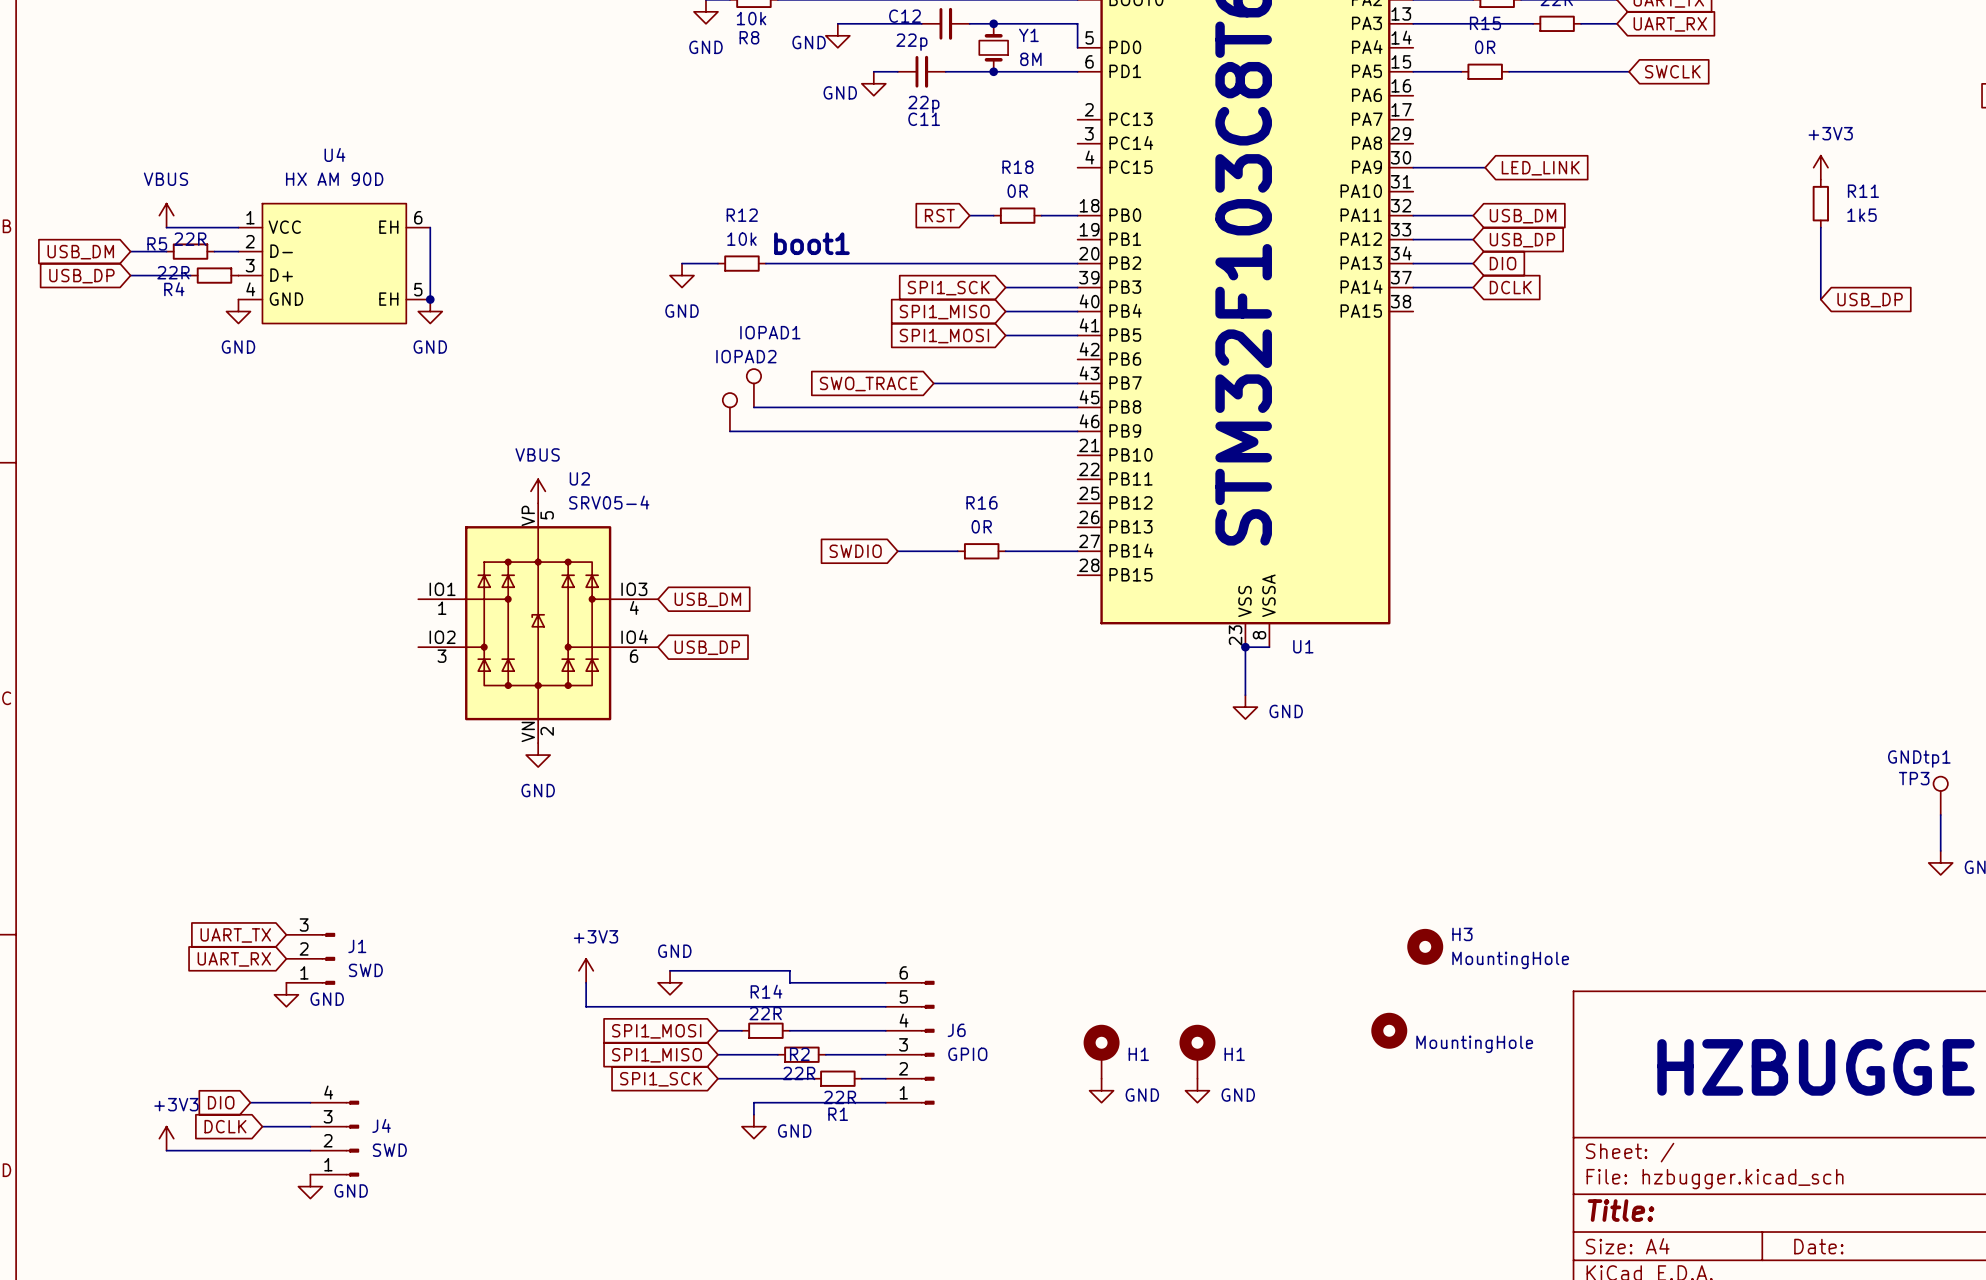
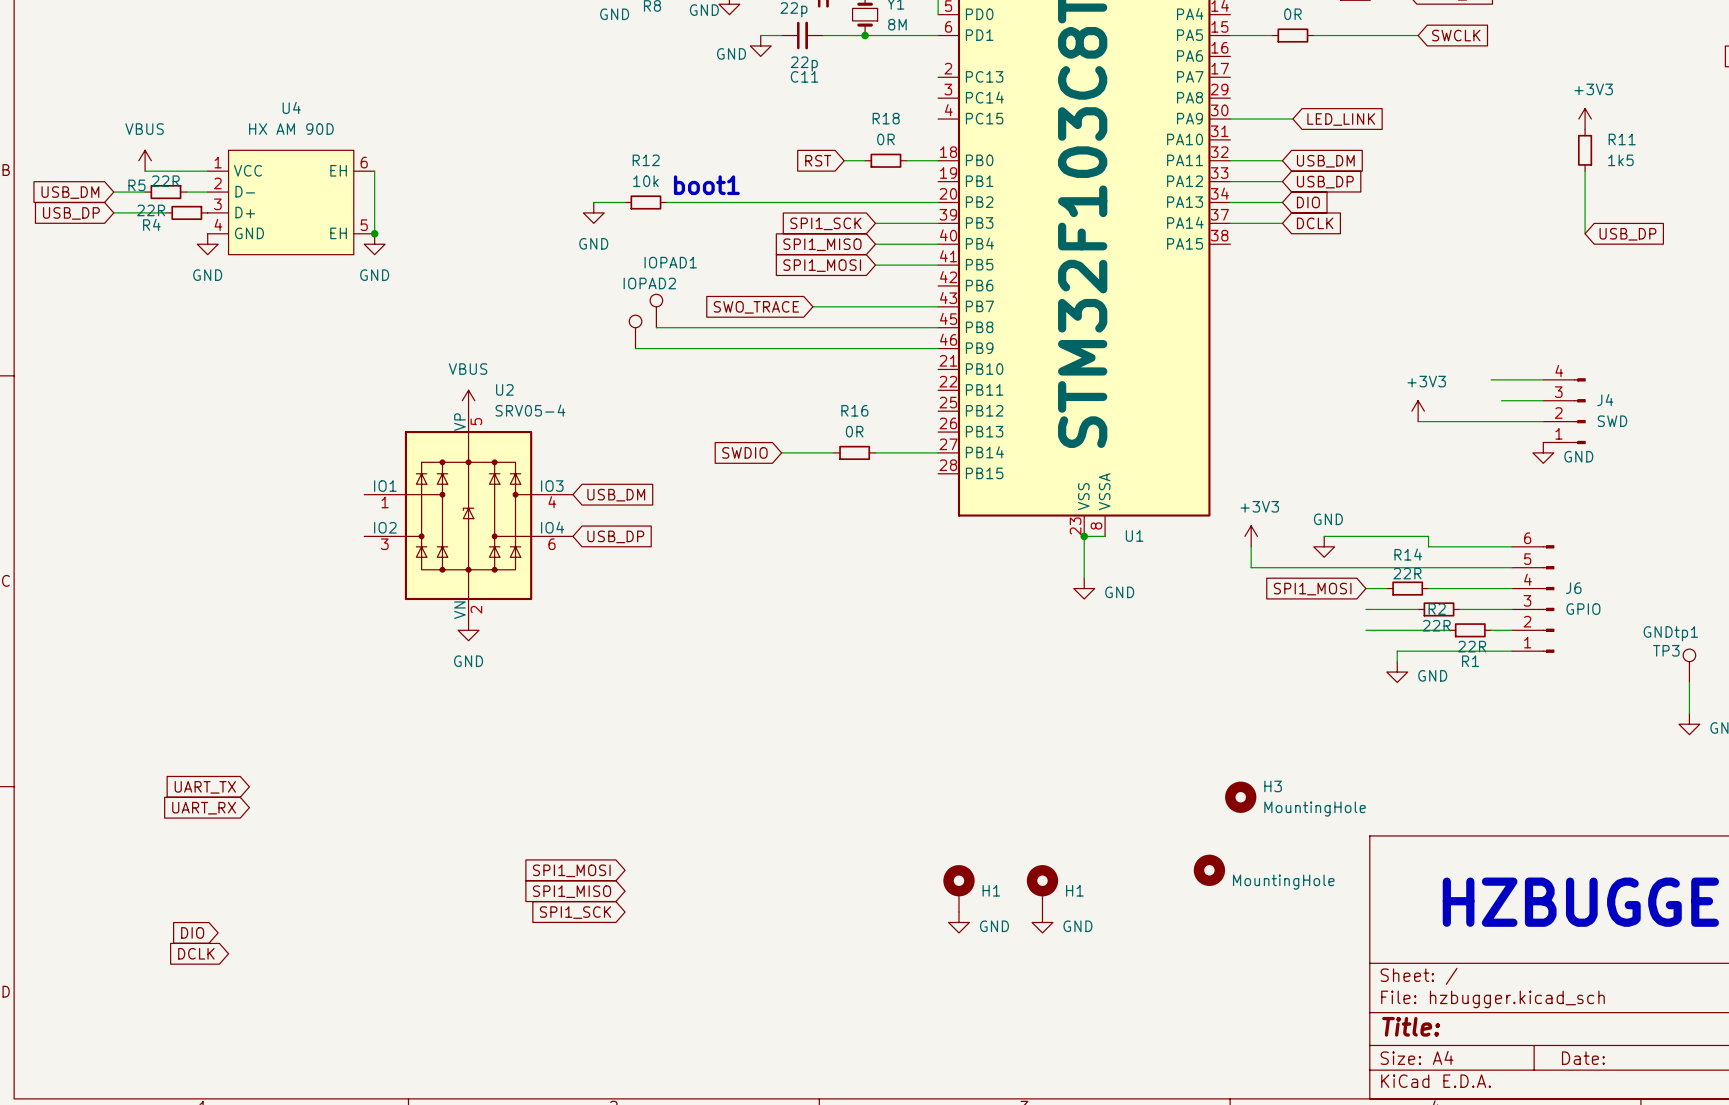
wire: none -> (1491, 379) (1543, 379)
wire: none -> (1501, 400) (1543, 400)
power symbol: none -> +3V3 (1418, 411)
wire: none -> (1418, 421) (1543, 421)
power symbol: none -> GND (1543, 452)
power symbol: none -> +3V3 (1251, 536)
wire: none -> (1324, 536) (1428, 536) (1428, 546) (1512, 546)
wire: none -> (1251, 546) (1251, 567) (1512, 567)
power symbol: none -> GND (1324, 546)
global label: none -> SPI1_MOSI (1312, 589)
wire: none -> (1365, 588) (1386, 588)
wire: none -> (1428, 588) (1512, 588)
wire: none -> (1365, 609) (1418, 609)
wire: none -> (1459, 609) (1512, 609)
wire: none -> (1365, 630) (1449, 630)
wire: none -> (1491, 630) (1512, 630)
wire: none -> (1512, 651) (1397, 651) (1397, 661)
power symbol: none -> GND (1397, 672)
J1: SWD (310, 958) -> none
power symbol: +3V3 (586, 970) -> none
wire: (670, 970) (789, 970) (789, 982) (885, 982) -> none
wire: (586, 982) (586, 1006) (885, 1006) -> none
power symbol: GND (670, 982) -> none
power symbol: GND (286, 994) -> none
wire: (717, 1030) (741, 1030) -> none
R14 position: (765, 1030) -> (1407, 588)
wire: (789, 1030) (885, 1030) -> none
J6 position: (910, 1042) -> (1533, 599)
wire: (717, 1054) (777, 1054) -> none
R2 position: (801, 1054) -> (1438, 609)
wire: (825, 1054) (885, 1054) -> none
wire: (717, 1078) (813, 1078) -> none
R1 position: (837, 1078) -> (1470, 630)
wire: (861, 1078) (885, 1078) -> none
wire: (250, 1102) (310, 1102) -> none
wire: (885, 1102) (753, 1102) (753, 1114) -> none
wire: (262, 1126) (310, 1126) -> none
power symbol: GND (753, 1126) -> none
power symbol: +3V3 (166, 1138) -> none
J4 position: (334, 1138) -> (1564, 411)
wire: (166, 1150) (310, 1150) -> none
power symbol: GND (310, 1186) -> none

